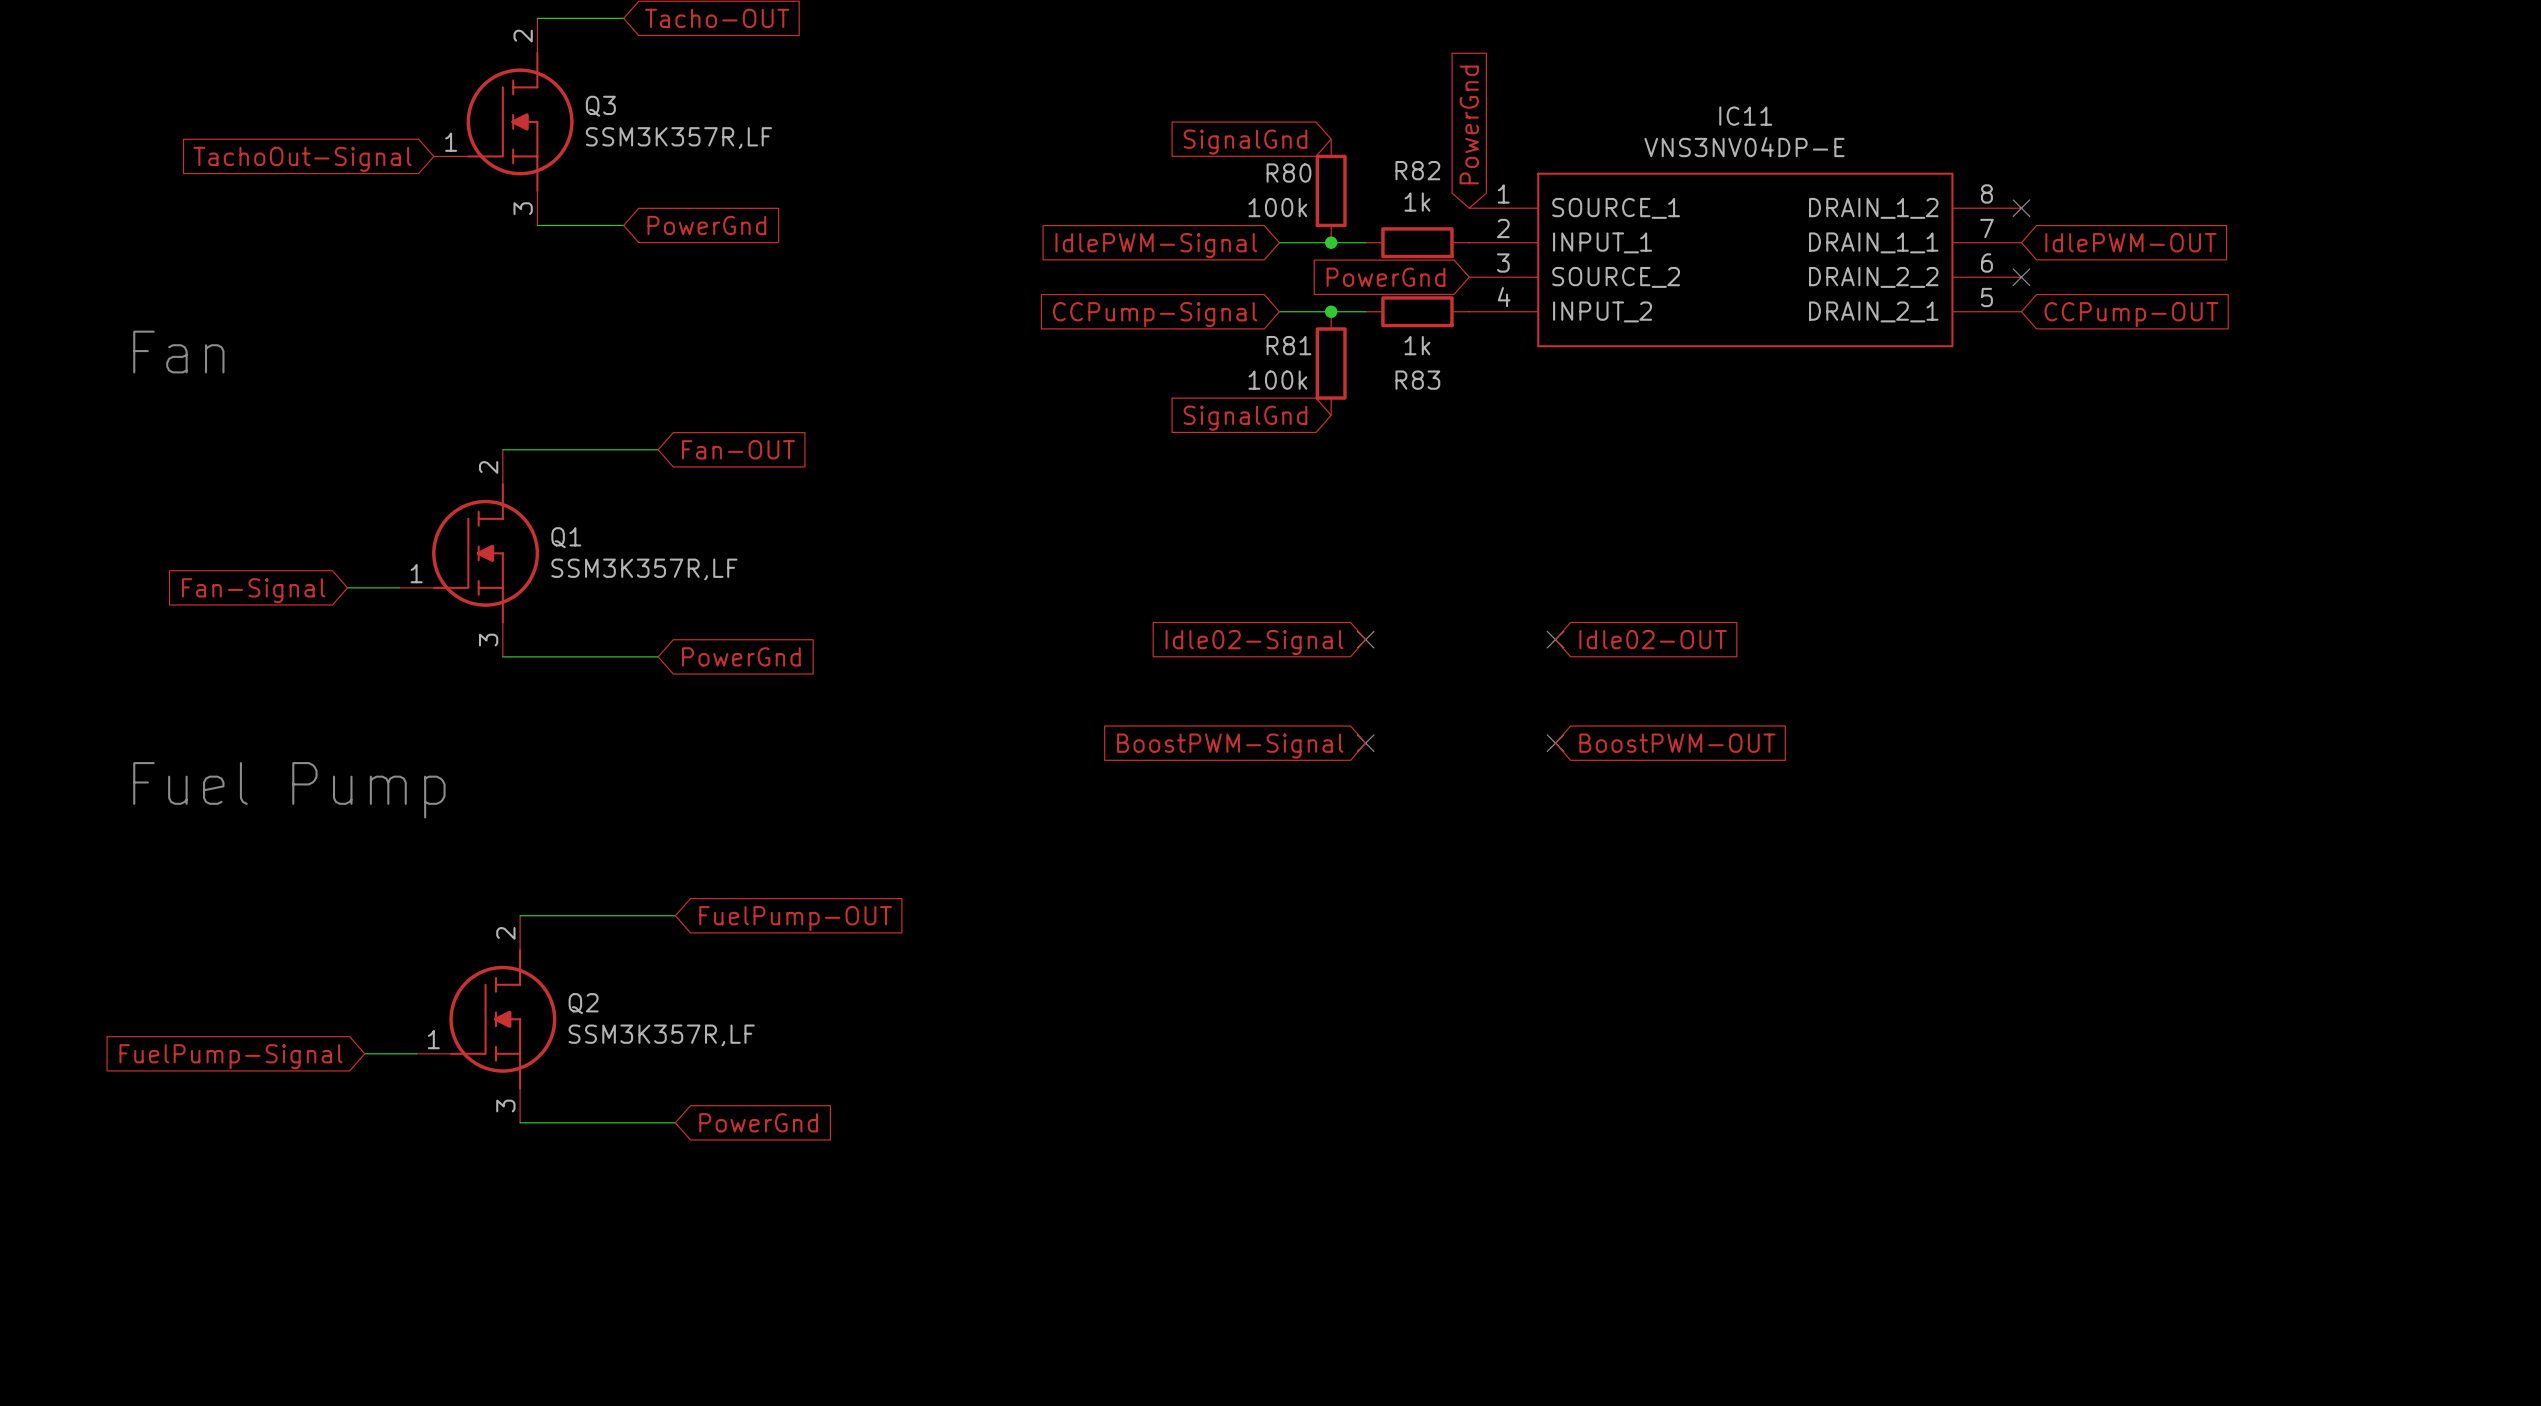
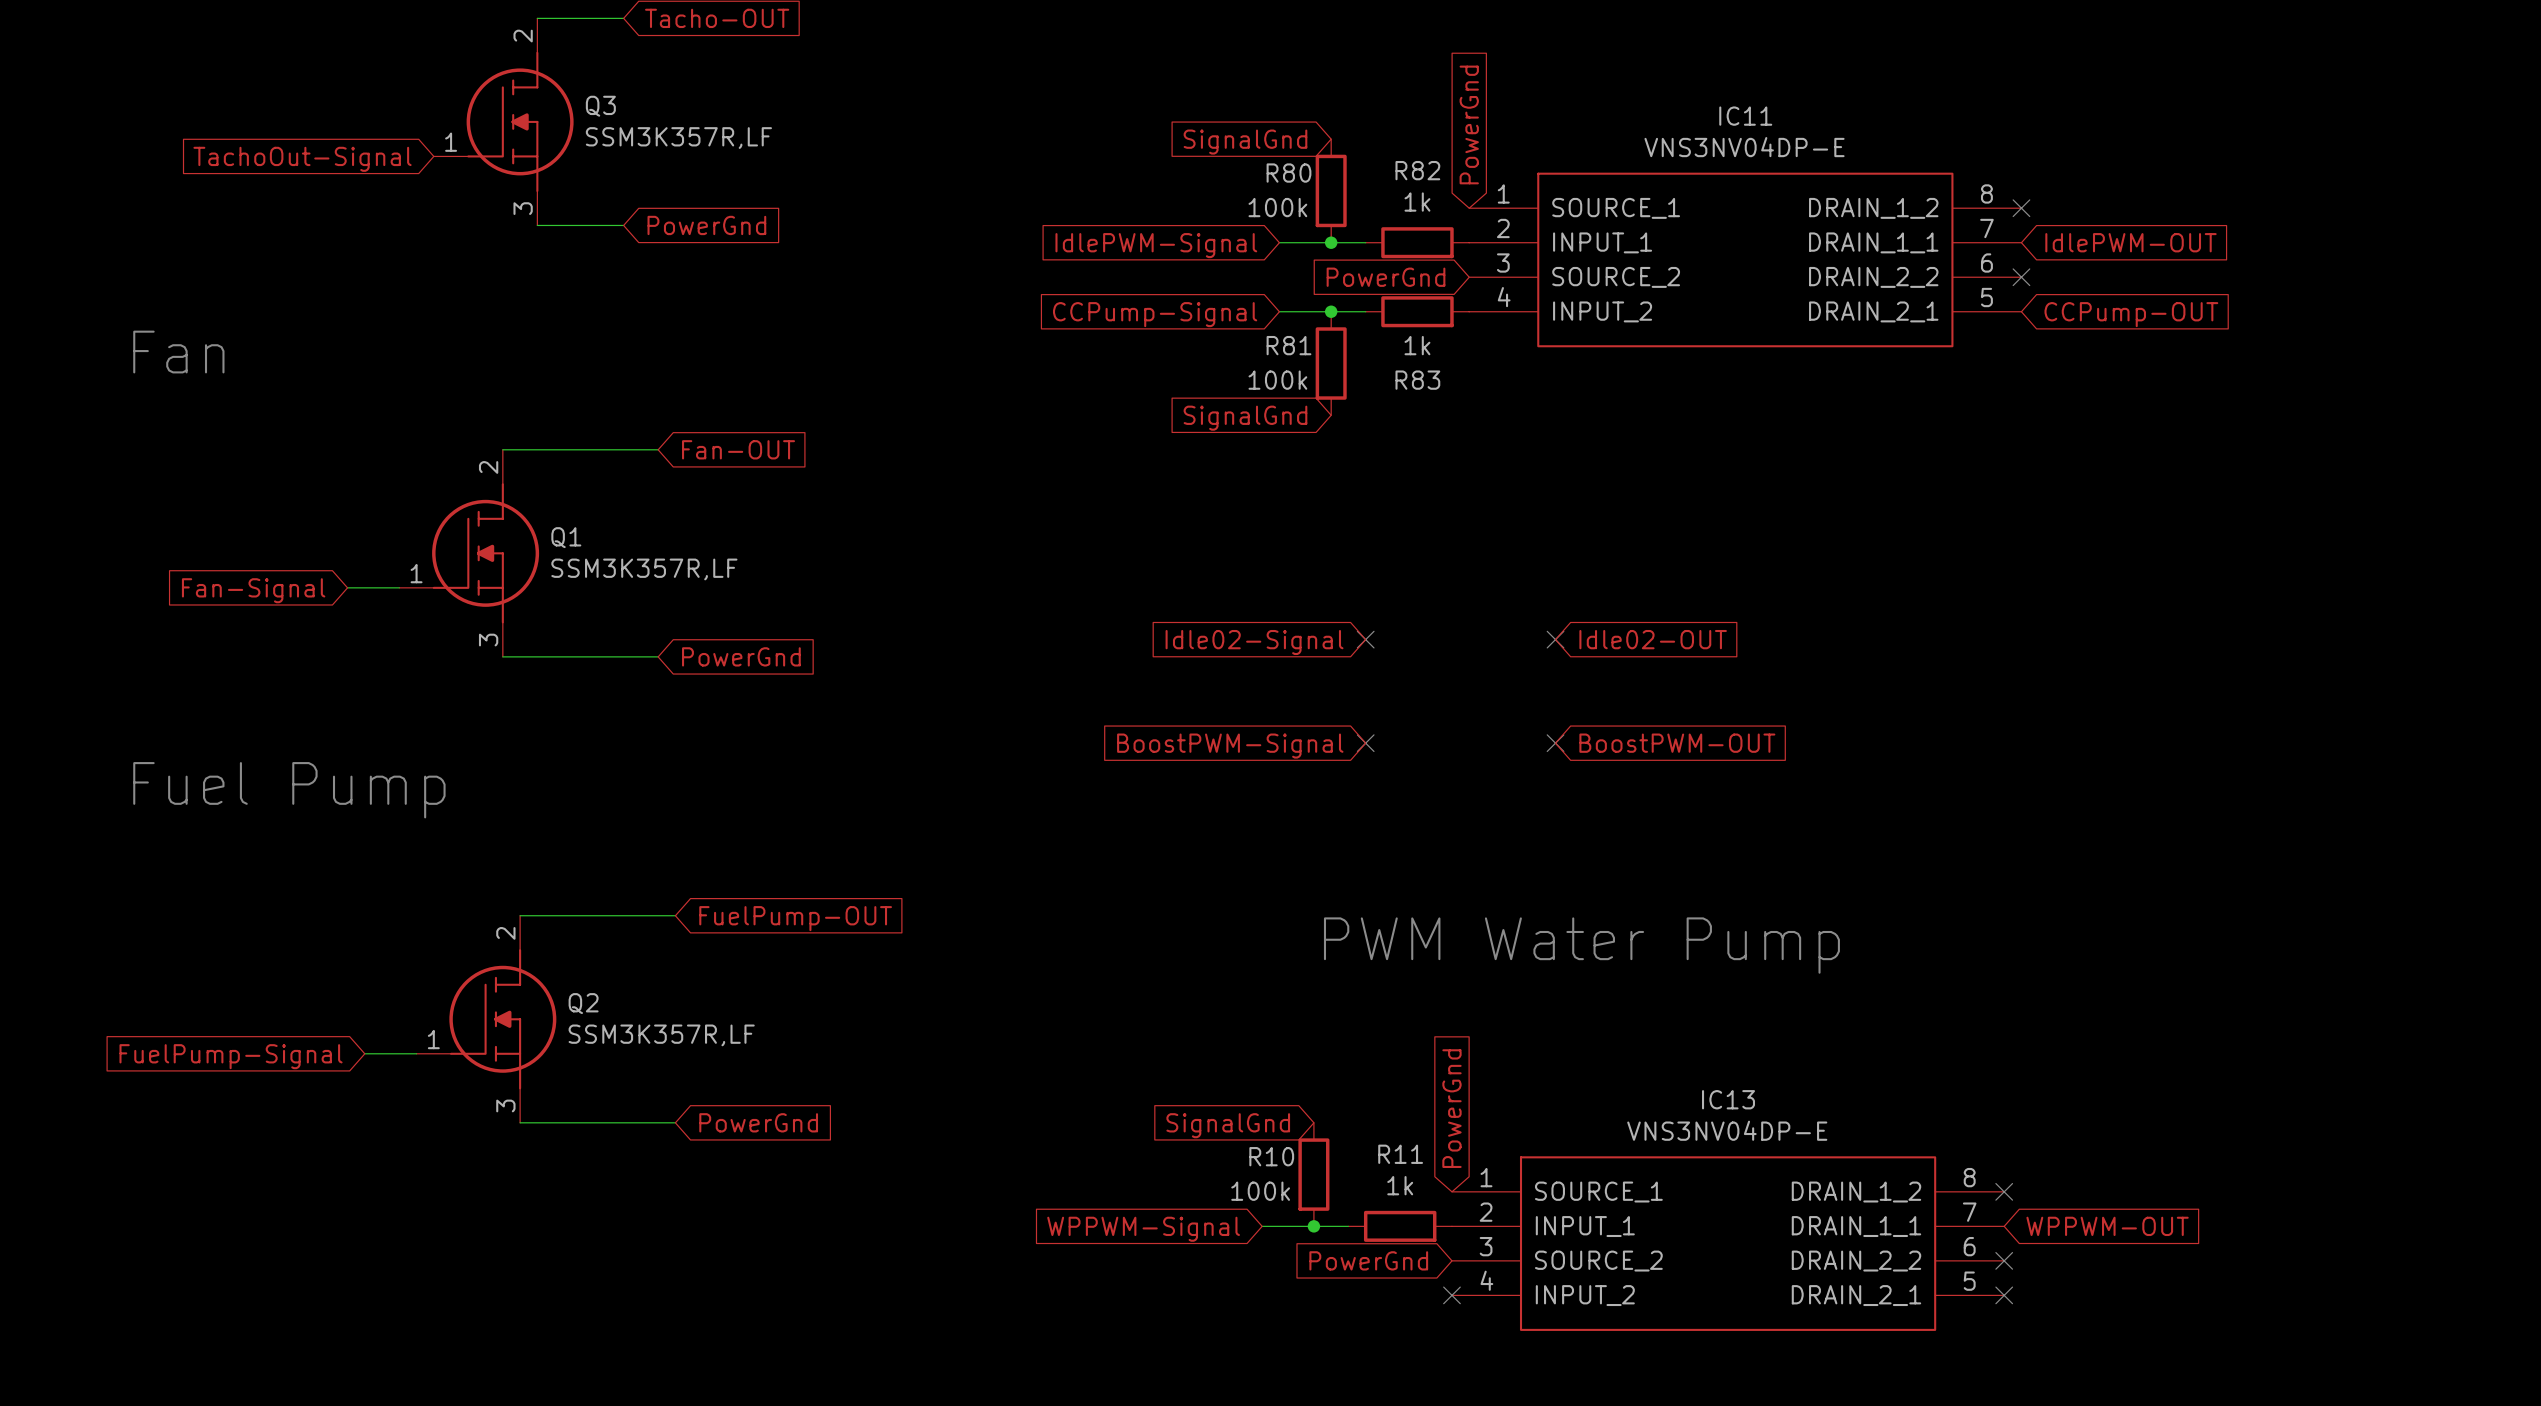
text: none -> PWM Water Pump (1581, 945)
global label: none -> PowerGnd (1451, 1108)
global label: none -> SignalGnd (1228, 1125)
R10: none -> 100k (1313, 1174)
no-connect mark: none -> (2004, 1191)
wire: none -> (1262, 1226) (1348, 1226)
junction: none -> (1313, 1226)
R11: none -> 1k (1400, 1226)
global label: none -> WPPWM-OUT (2107, 1226)
global label: none -> WPPWM-Signal (1143, 1229)
IC13: none -> VNS3NV04DP-E (1728, 1243)
global label: none -> PowerGnd (1368, 1260)
no-connect mark: none -> (2004, 1260)
no-connect mark: none -> (1451, 1295)
no-connect mark: none -> (2004, 1295)

